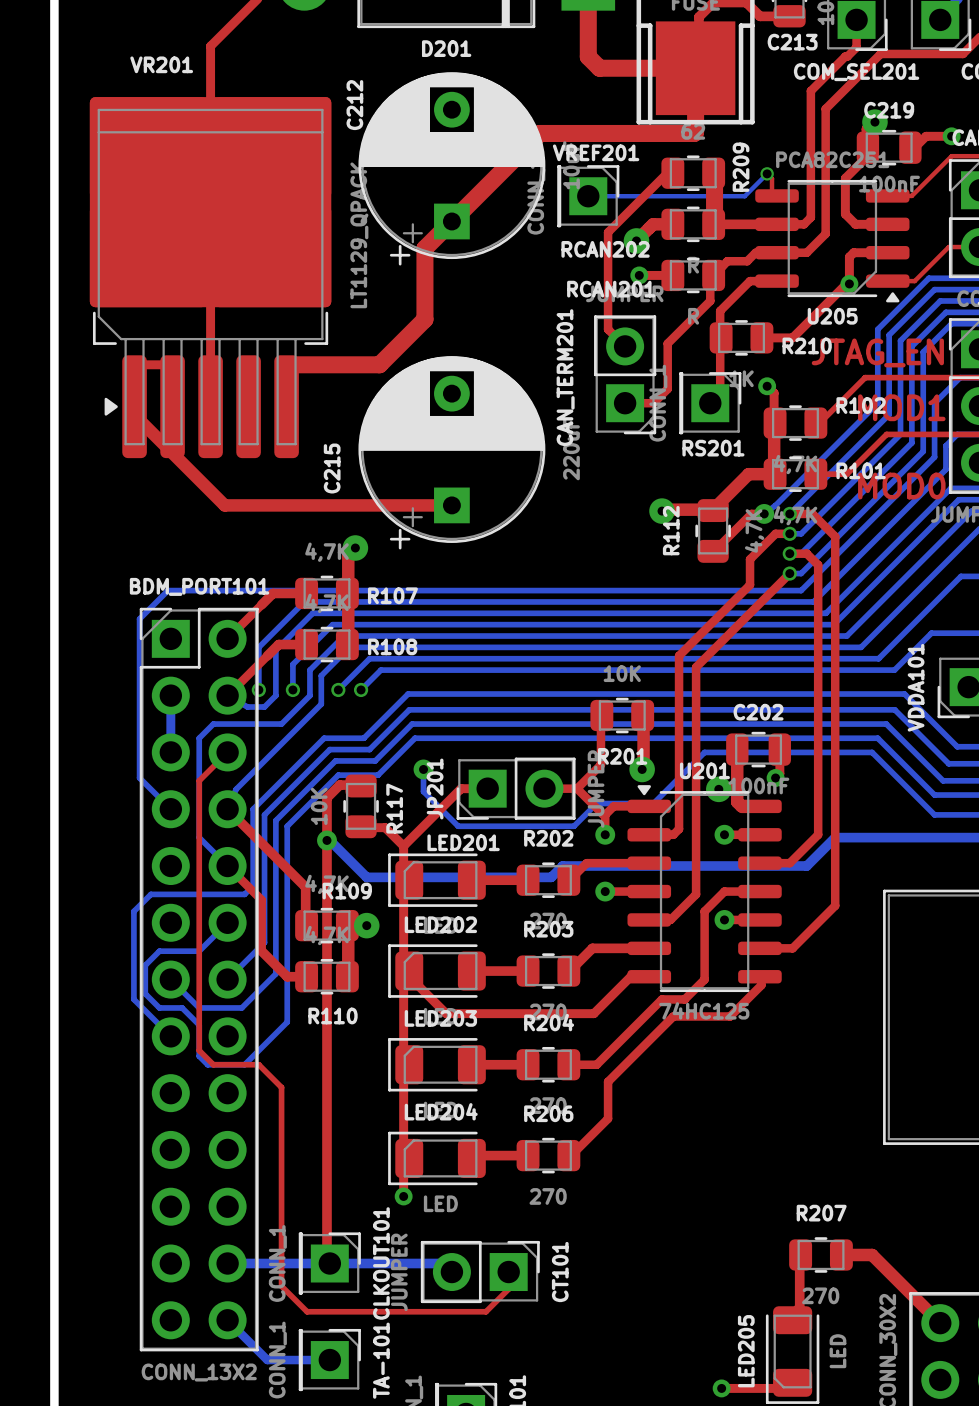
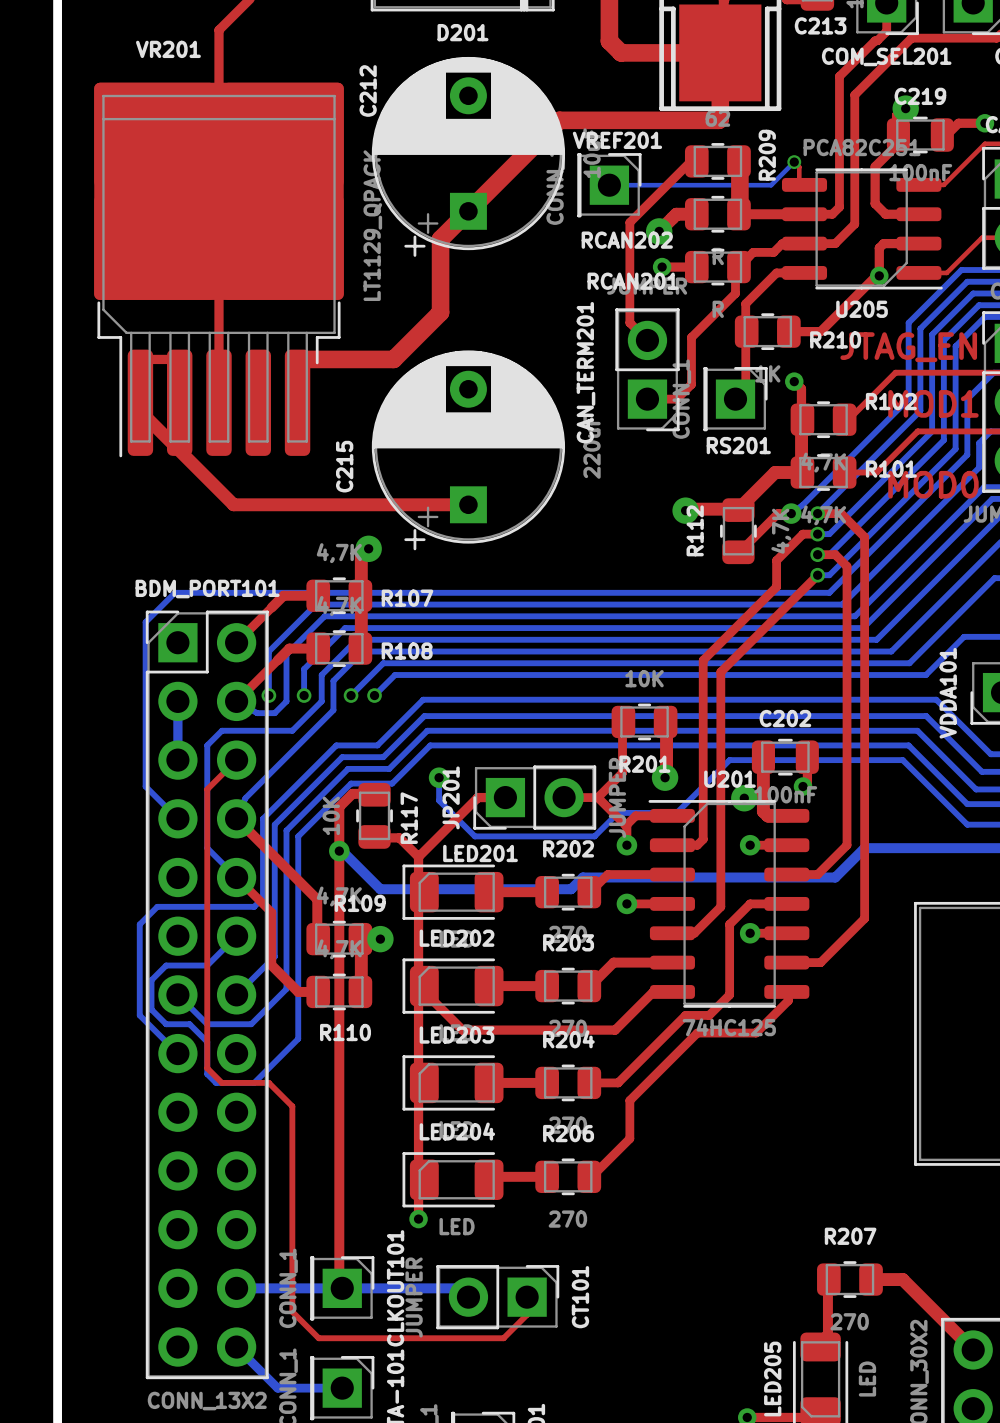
VR201 footprint: [89, 97, 332, 459] -> [94, 82, 344, 458]
U205 footprint: [755, 179, 910, 303] -> [781, 168, 943, 290]
U201 footprint: [627, 785, 782, 993] -> [648, 800, 810, 1008]

